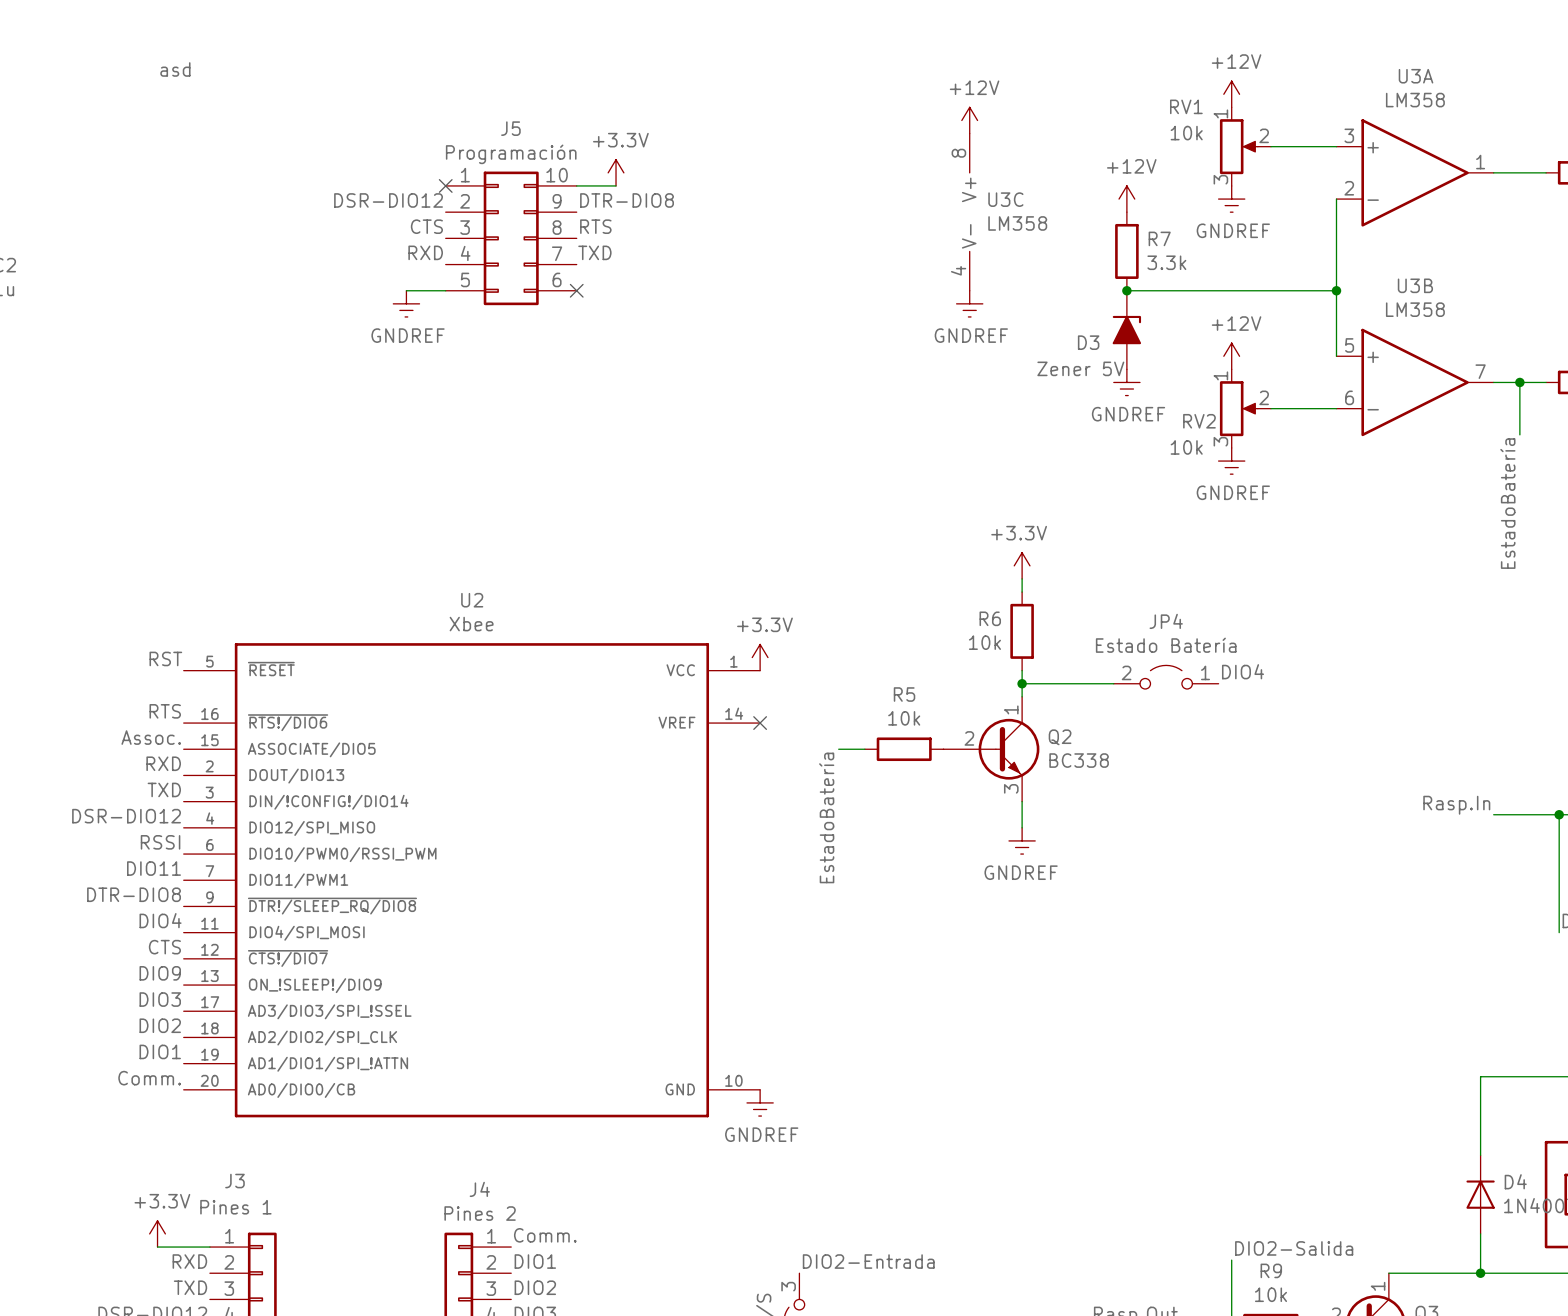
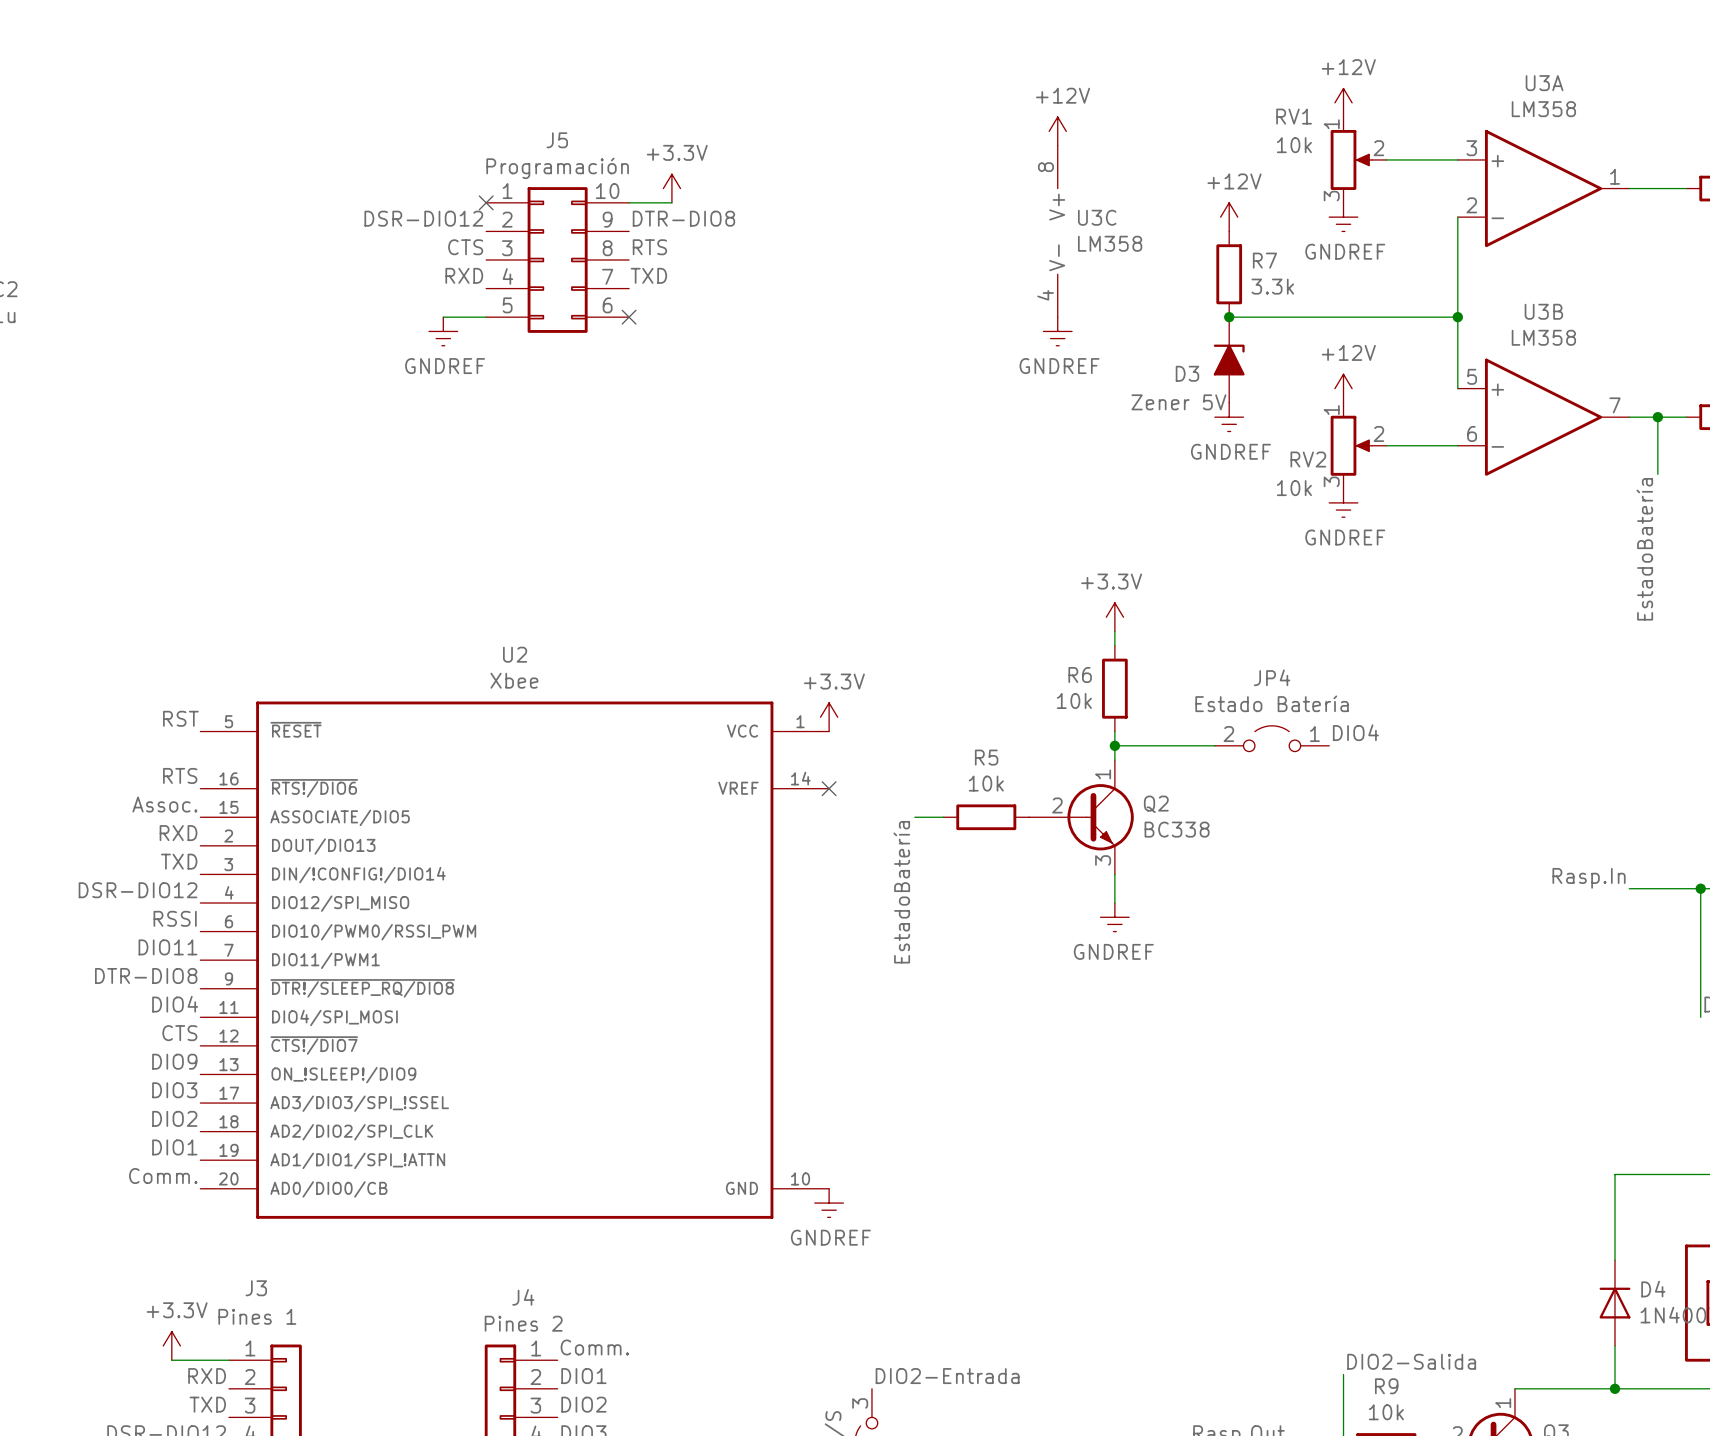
label: asd (175, 69) -> none

